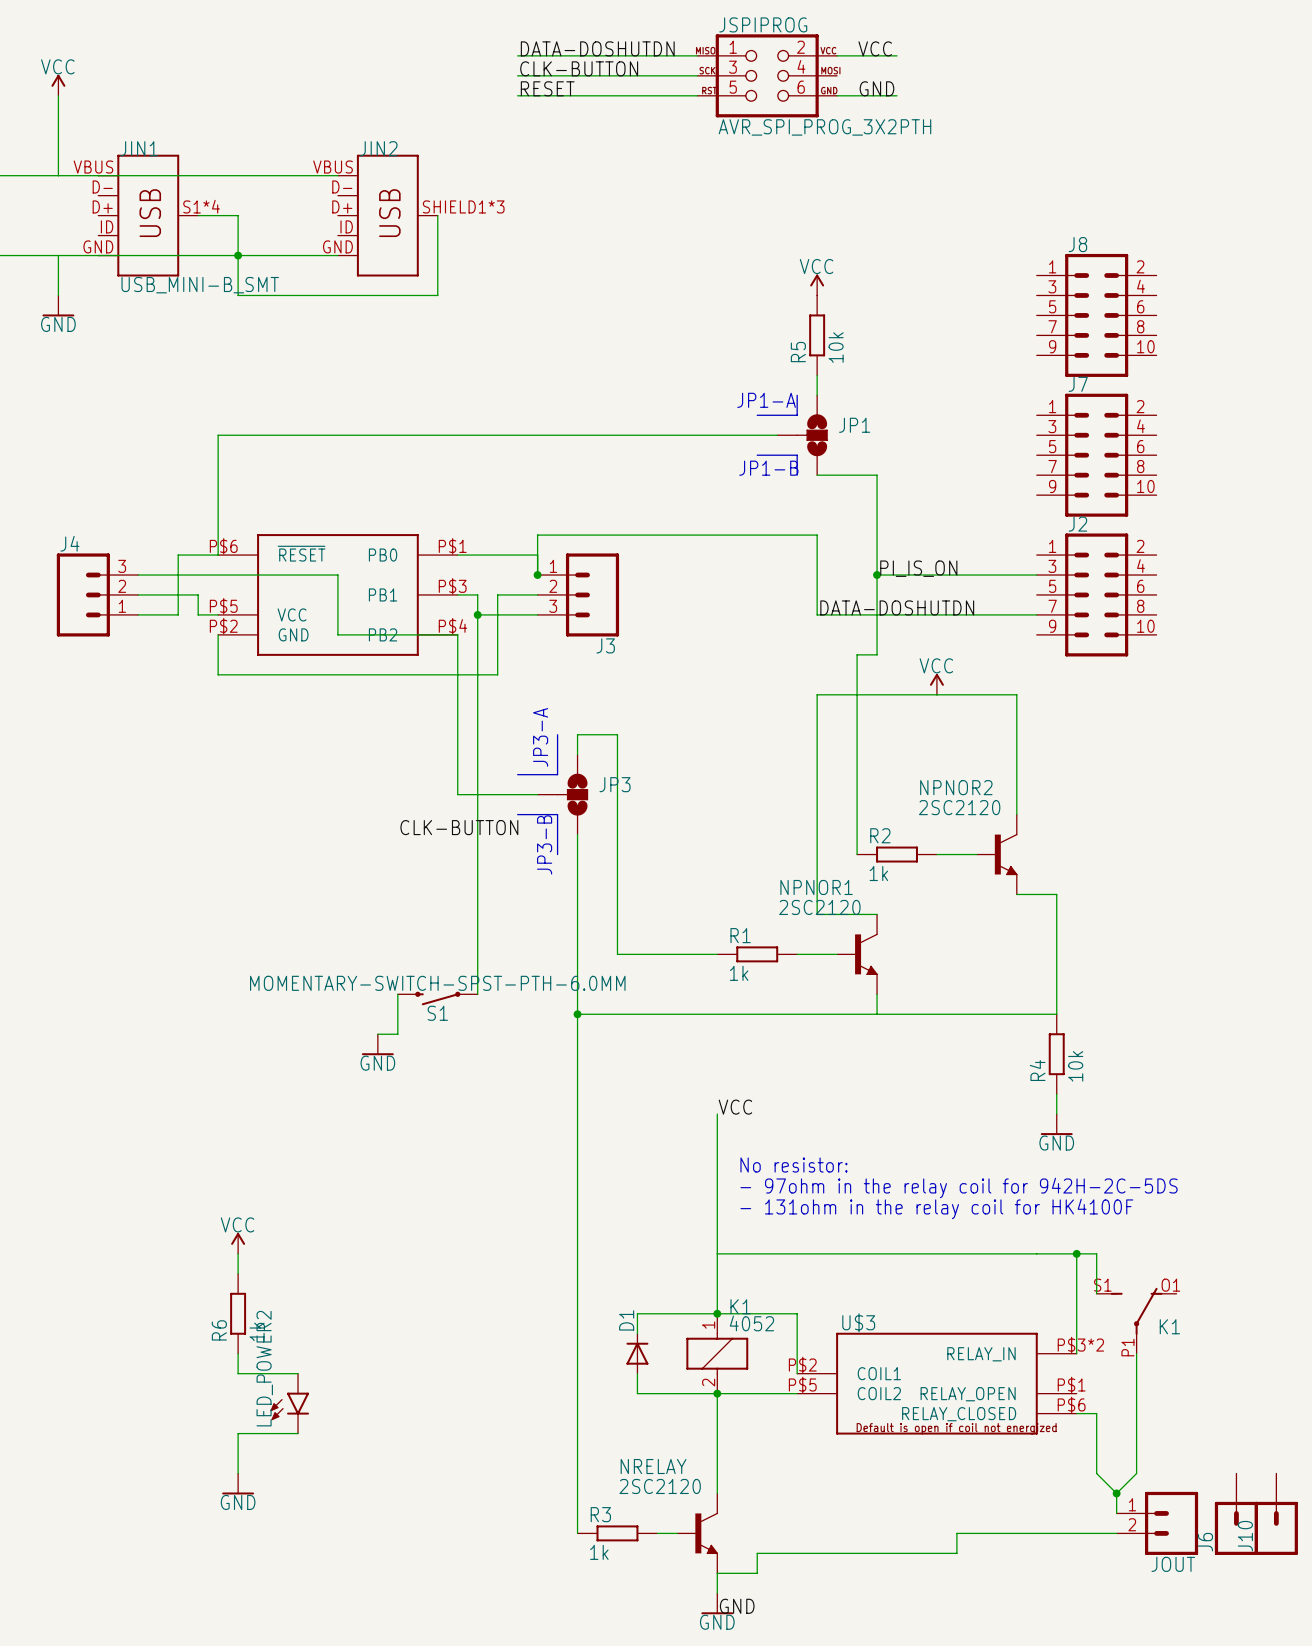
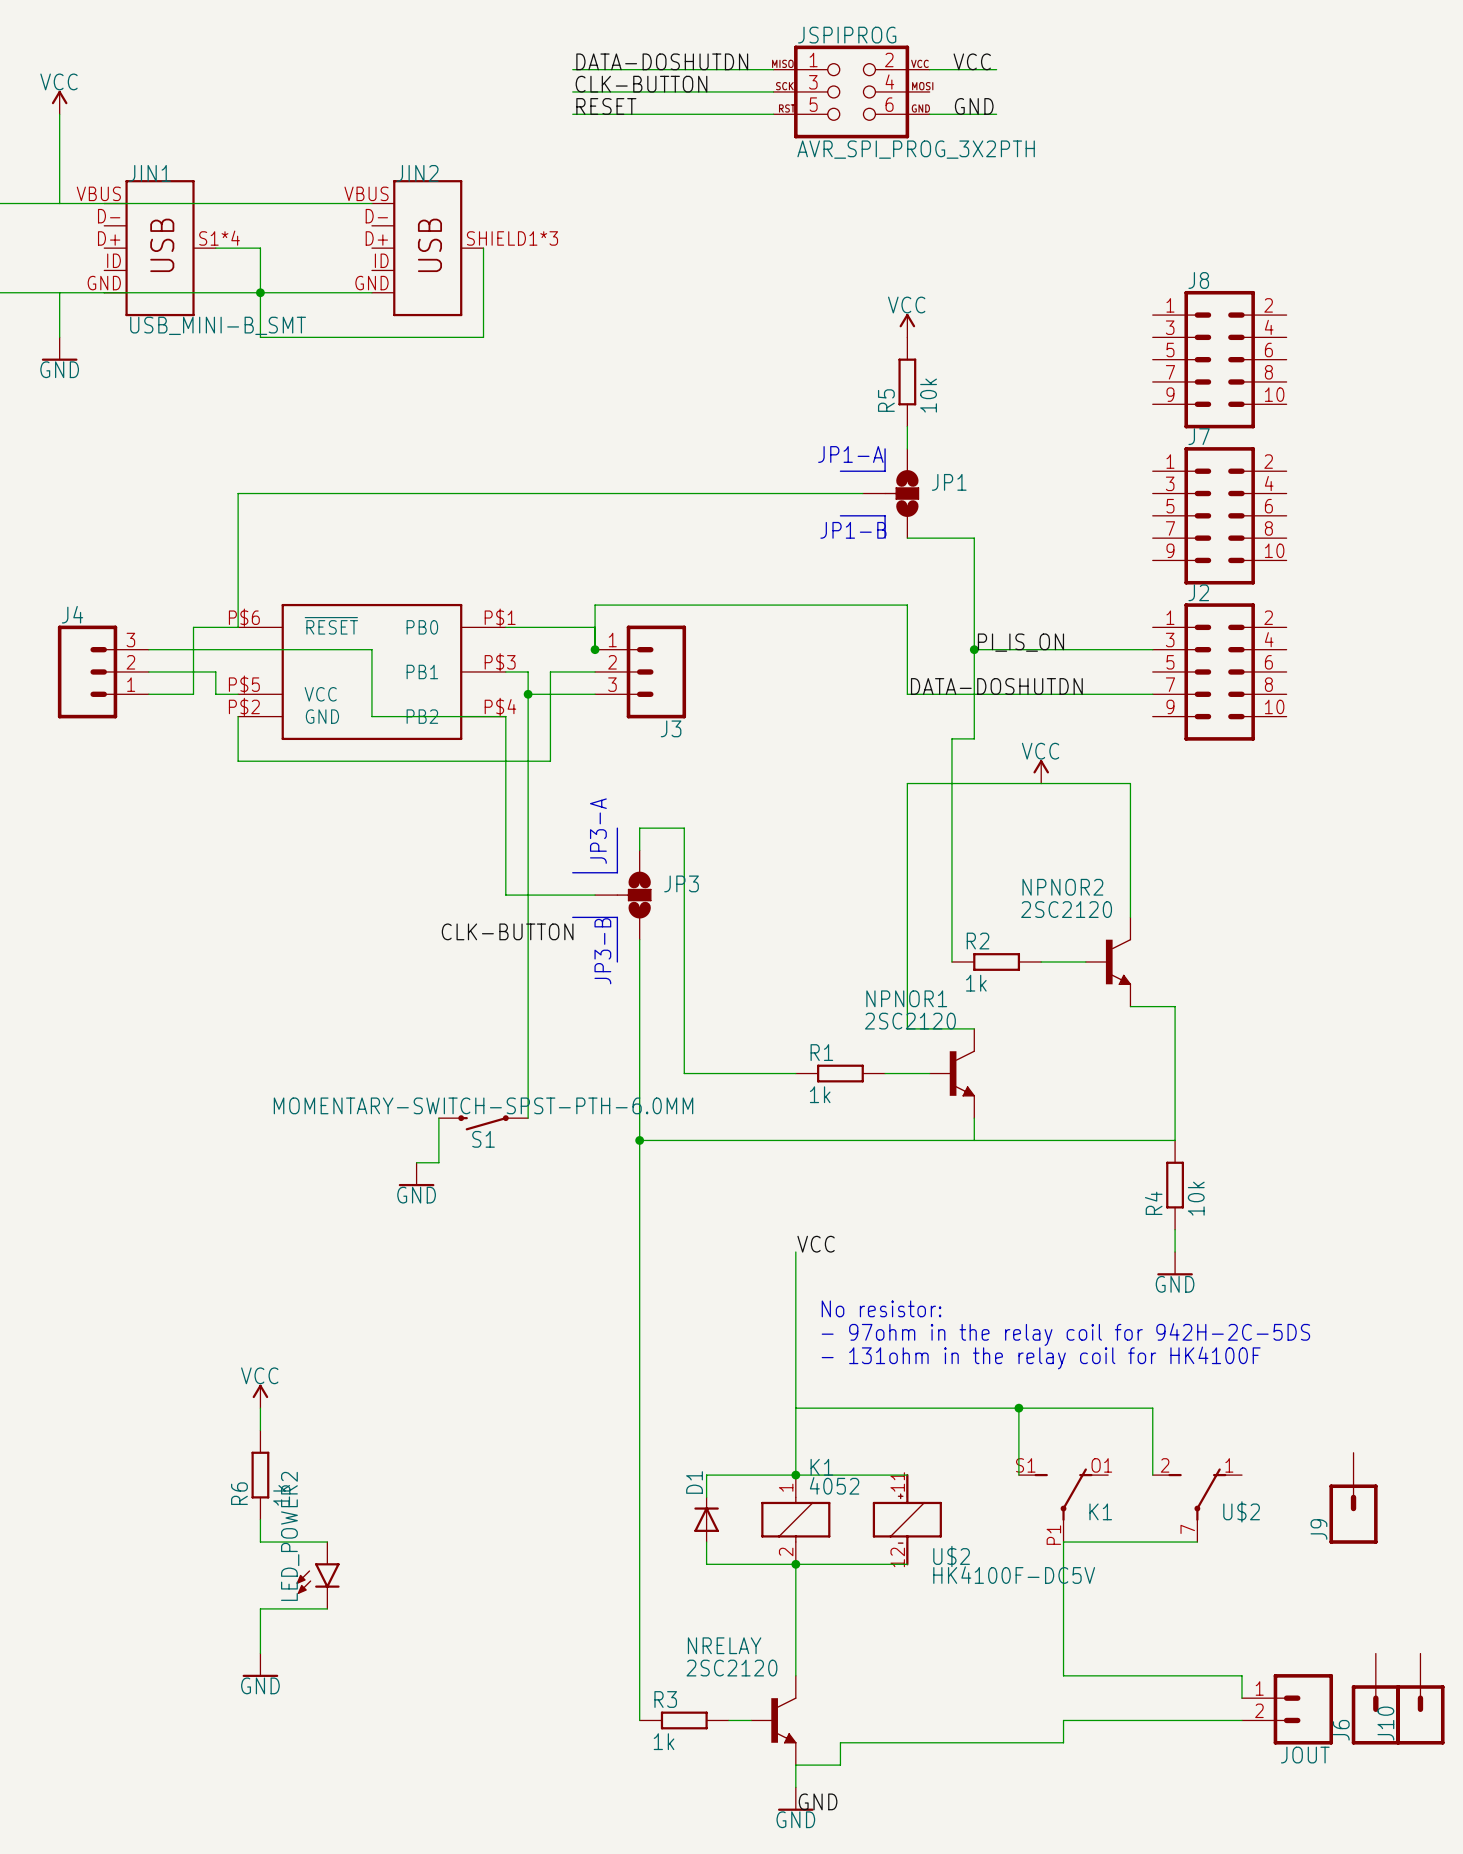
wire: none -> (1018, 1408) (1018, 1475)
junction: none -> (1018, 1408)
wire: (1036, 1253) (1096, 1253) (1096, 1293) -> (1152, 1408) (1152, 1475)
wire: (1076, 1253) (1076, 1353) -> none
junction: (1076, 1253) -> none
wire: (797, 1313) (797, 1373) -> (885, 1475) (907, 1475)
K1 position: (1136, 1320) -> (1063, 1505)
J9: none -> (1353, 1498)
U$2: none -> (1197, 1505)
U$2: none -> HK4100F-DC5V (907, 1519)
wire: (1136, 1353) (1136, 1473) (1116, 1493) (1096, 1473) (1096, 1413) (1076, 1413) -> none
wire: none -> (1197, 1542) (1063, 1542) (1063, 1675) (1241, 1675)
U$3: (936, 1383) -> none
junction: (1116, 1493) -> none

